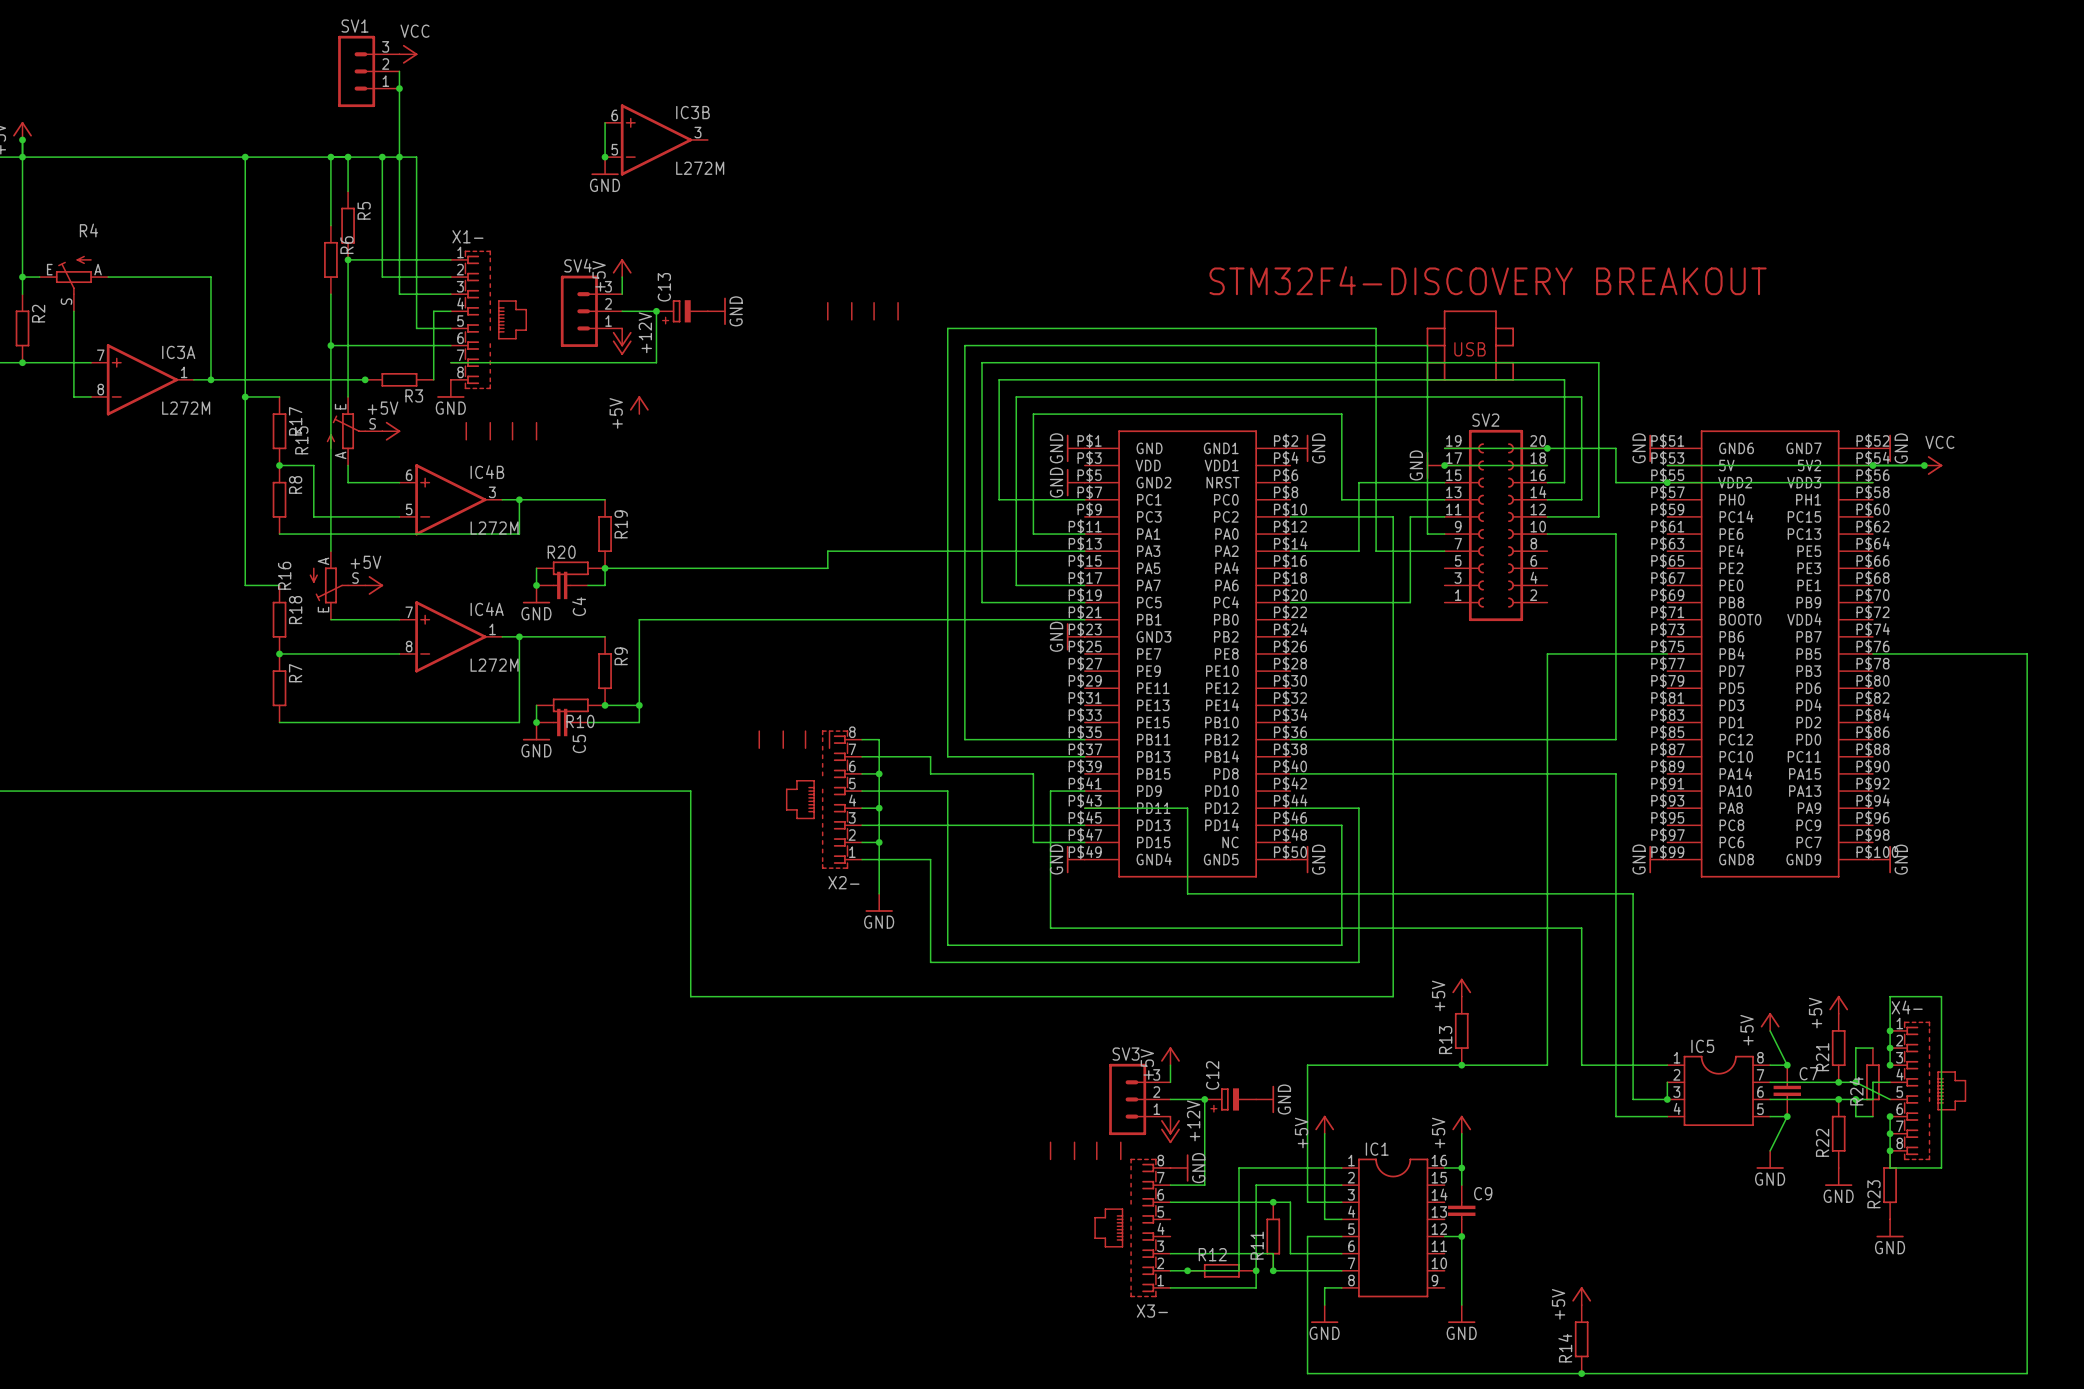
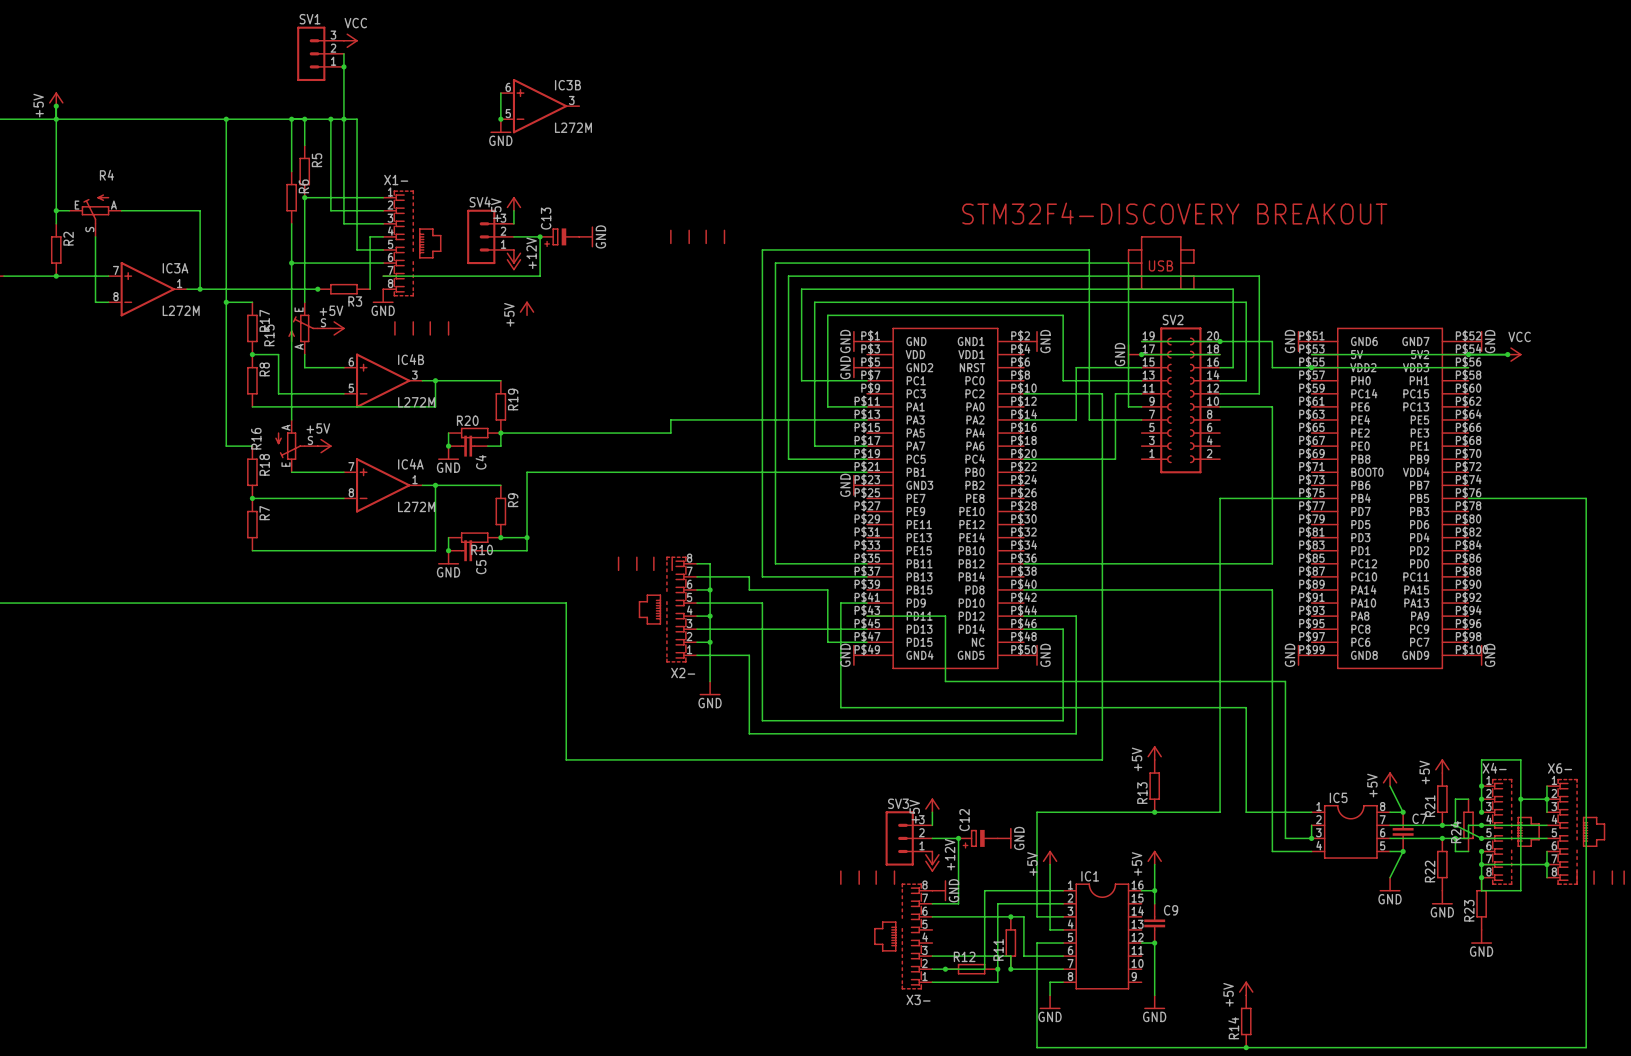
wire: none -> (1546, 786) (1546, 812)
wire: none -> (1520, 799) (1546, 799)
junction: none -> (1520, 799)
junction: none -> (1546, 799)
wire: none -> (1481, 825) (1546, 825)
junction: none -> (1481, 825)
X6-: none -> (1576, 831)
wire: none -> (1481, 838) (1546, 838)
junction: none -> (1481, 838)
wire: none -> (1546, 851) (1546, 877)
wire: none -> (1481, 864) (1546, 864)
junction: none -> (1546, 864)
part: none -> (1577, 877)
part: none -> (1594, 877)
part: none -> (1612, 877)
part: none -> (1624, 877)

